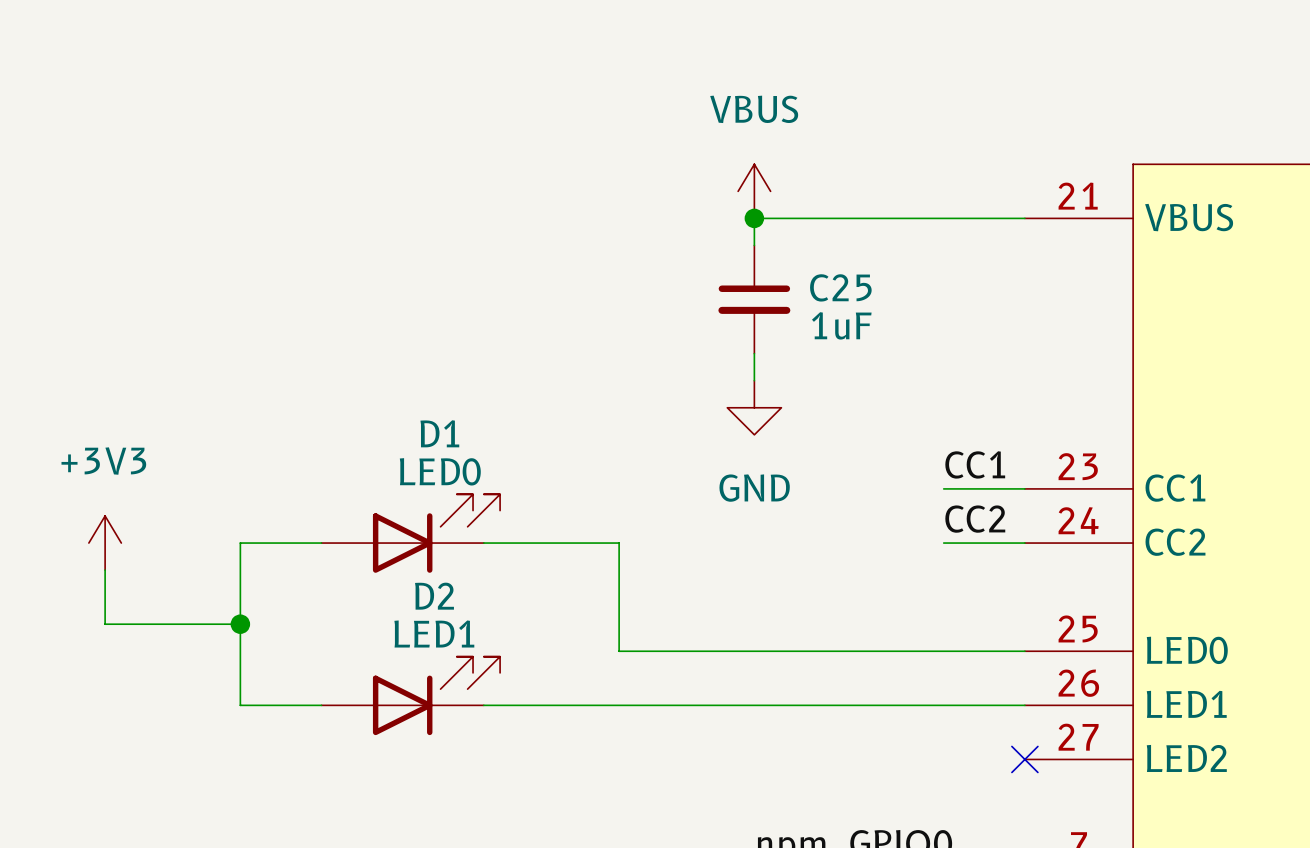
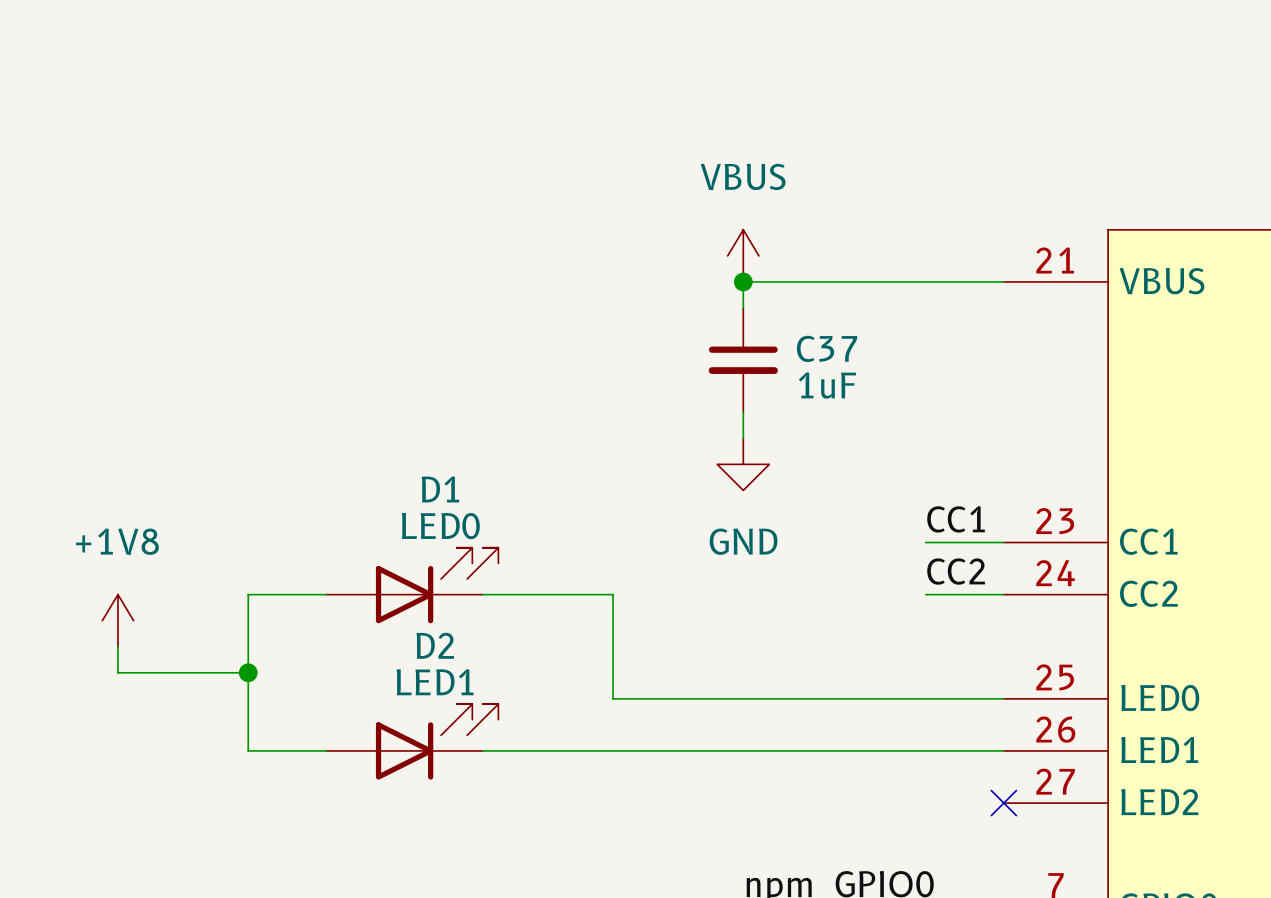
C25 name: C25 (840, 287) -> C37 (827, 348)
power symbol: +3V3 (105, 543) -> none
power symbol: none -> +1V8 (117, 620)

